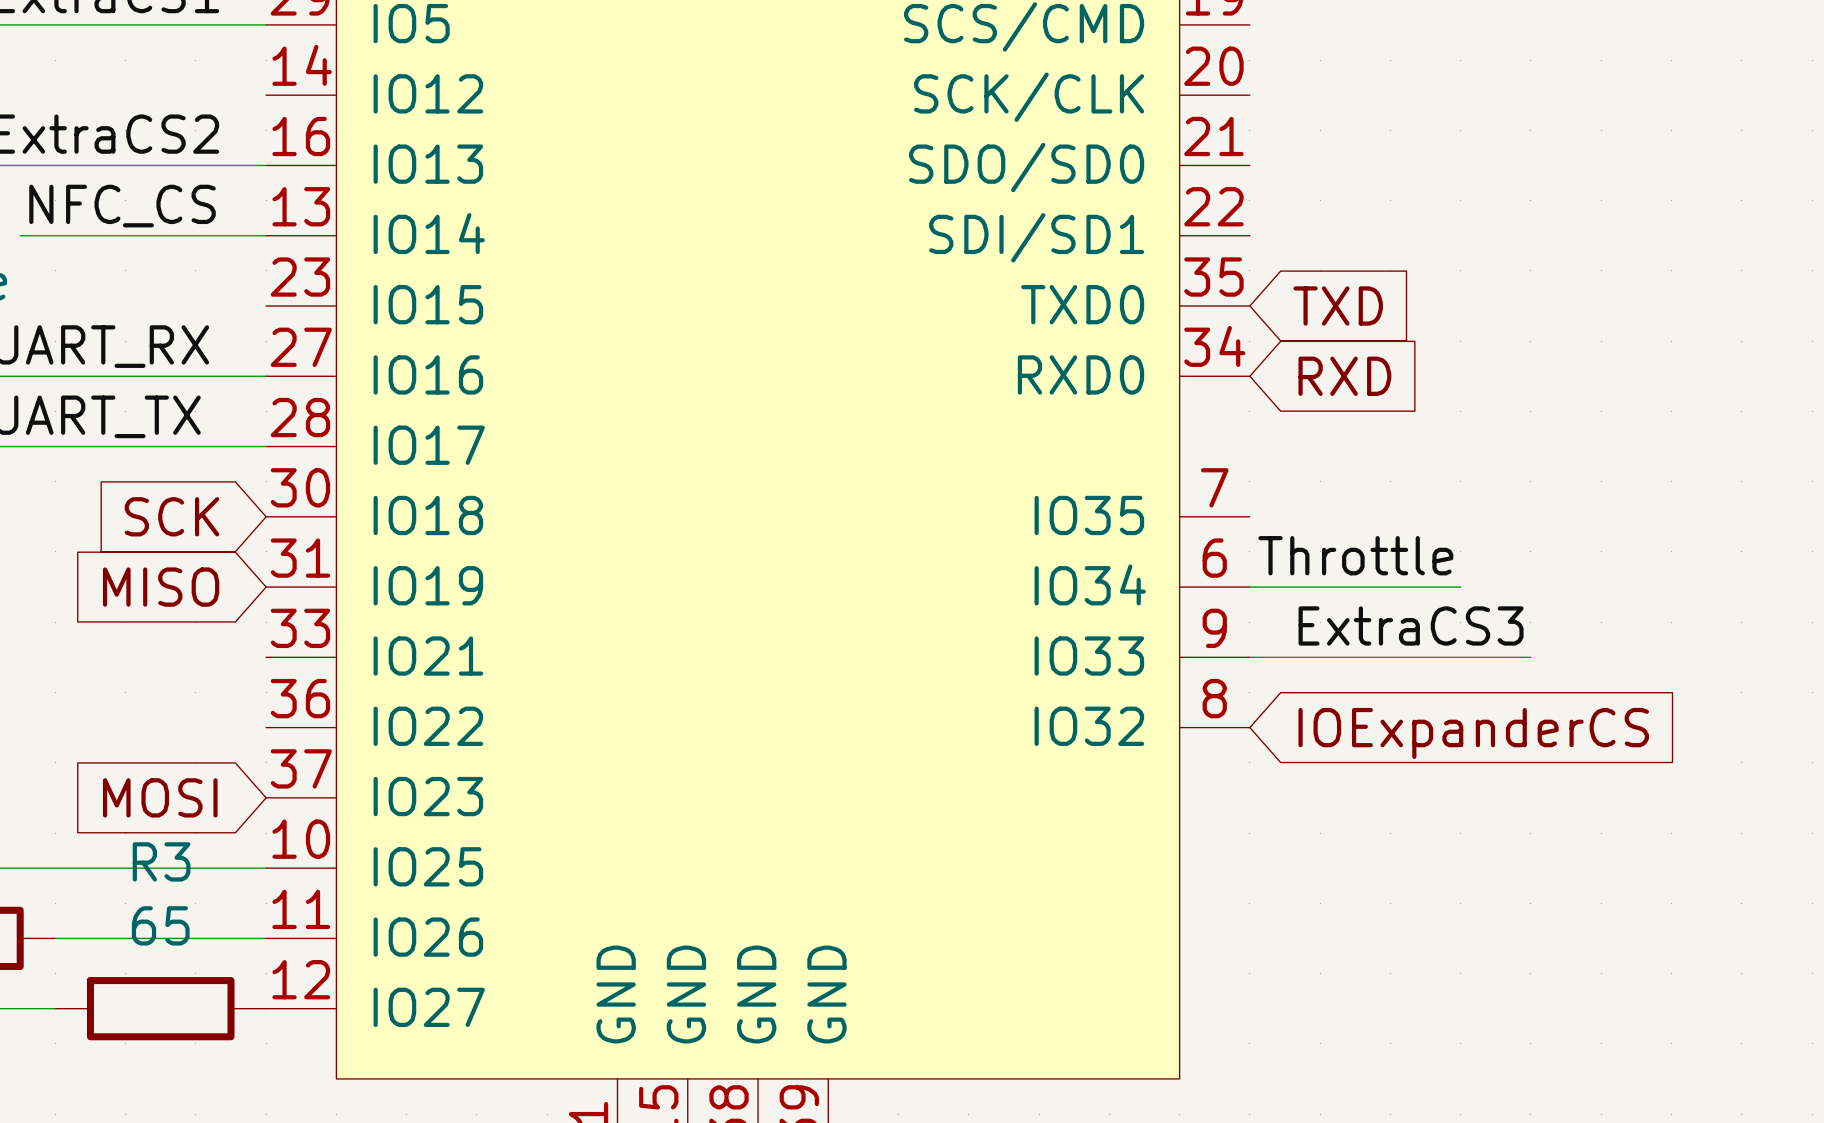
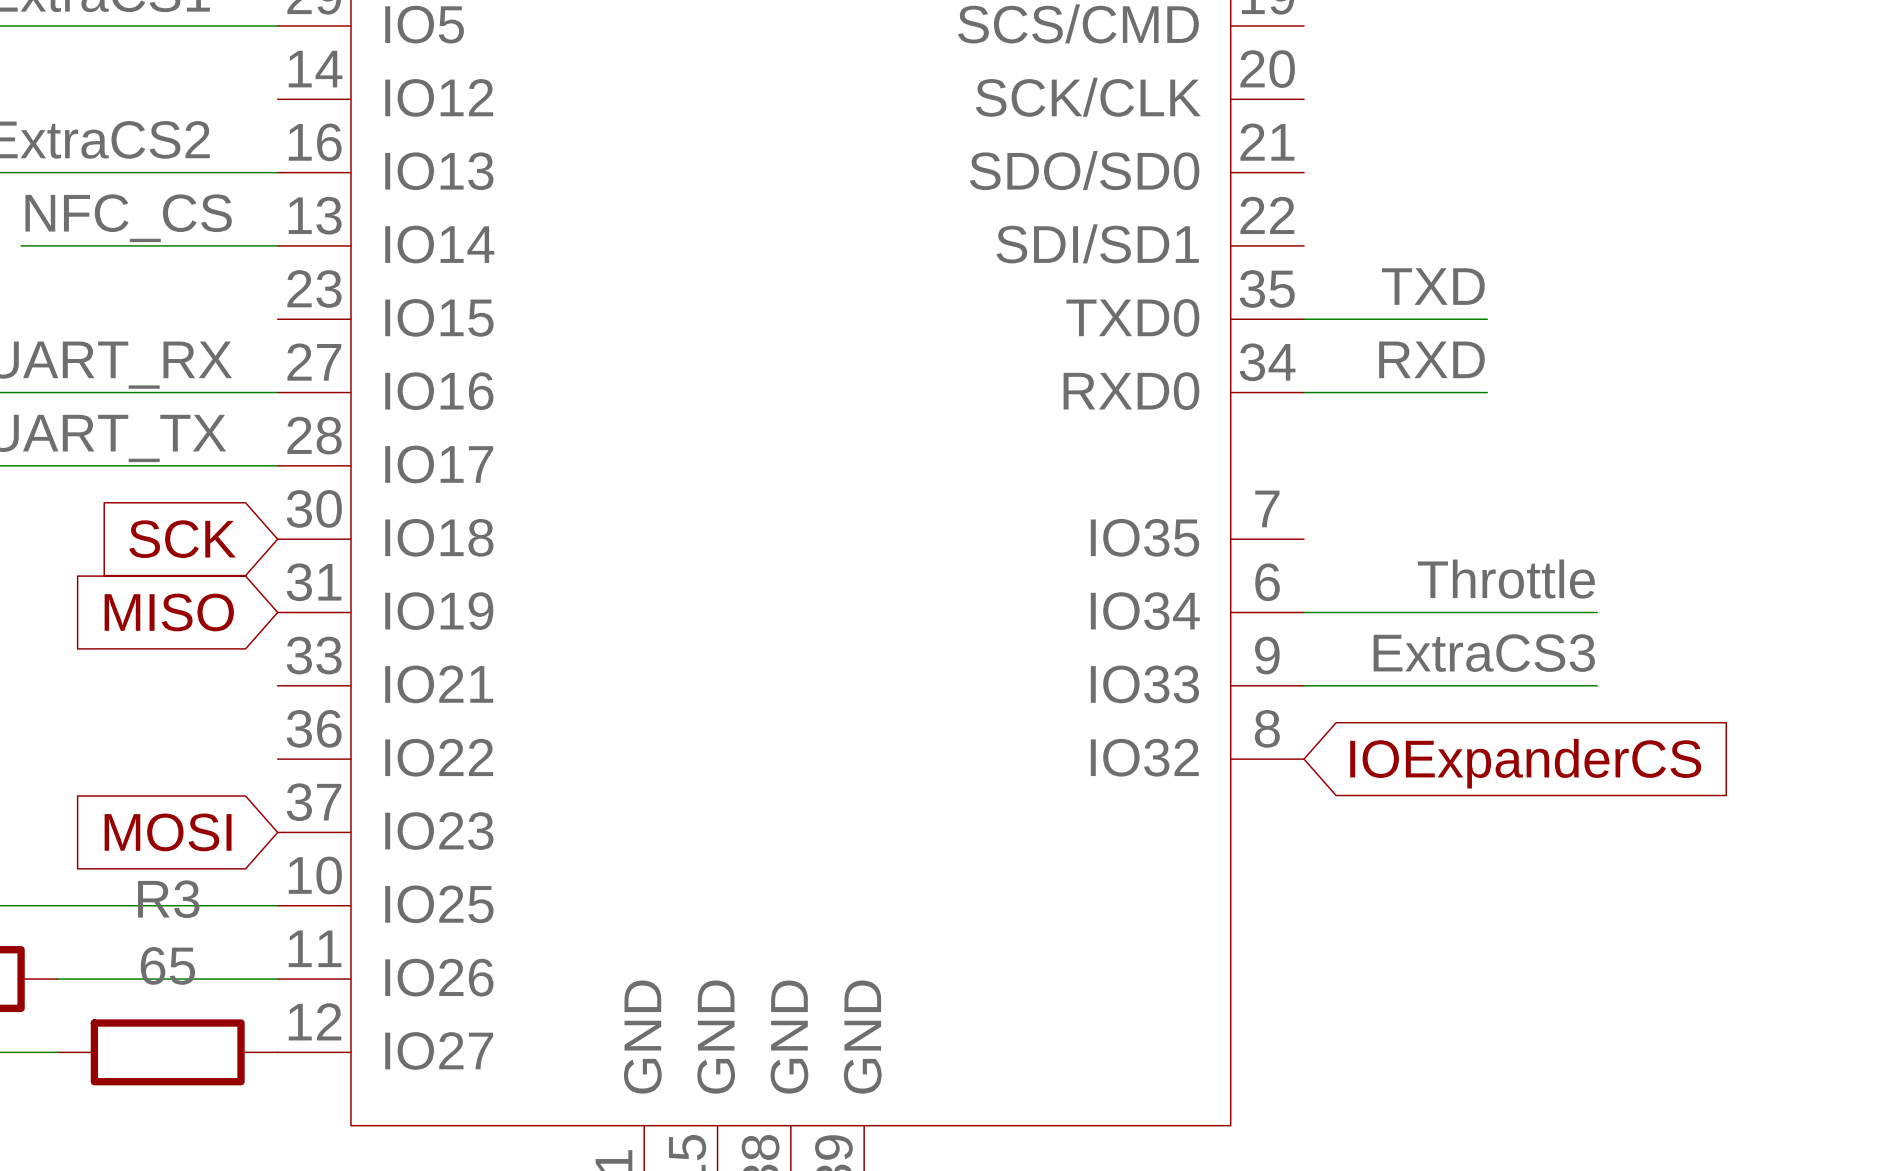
label: none -> TXD (1433, 286)
wire: none -> (1304, 319) (1487, 319)
global label: TXD (1338, 306) -> none
label: none -> RXD (1431, 359)
wire: none -> (1304, 392) (1487, 392)
global label: RXD (1344, 376) -> none
label position: Throttle (1355, 555) -> Throttle (1506, 579)
wire: none -> (1523, 612) (1597, 612)

